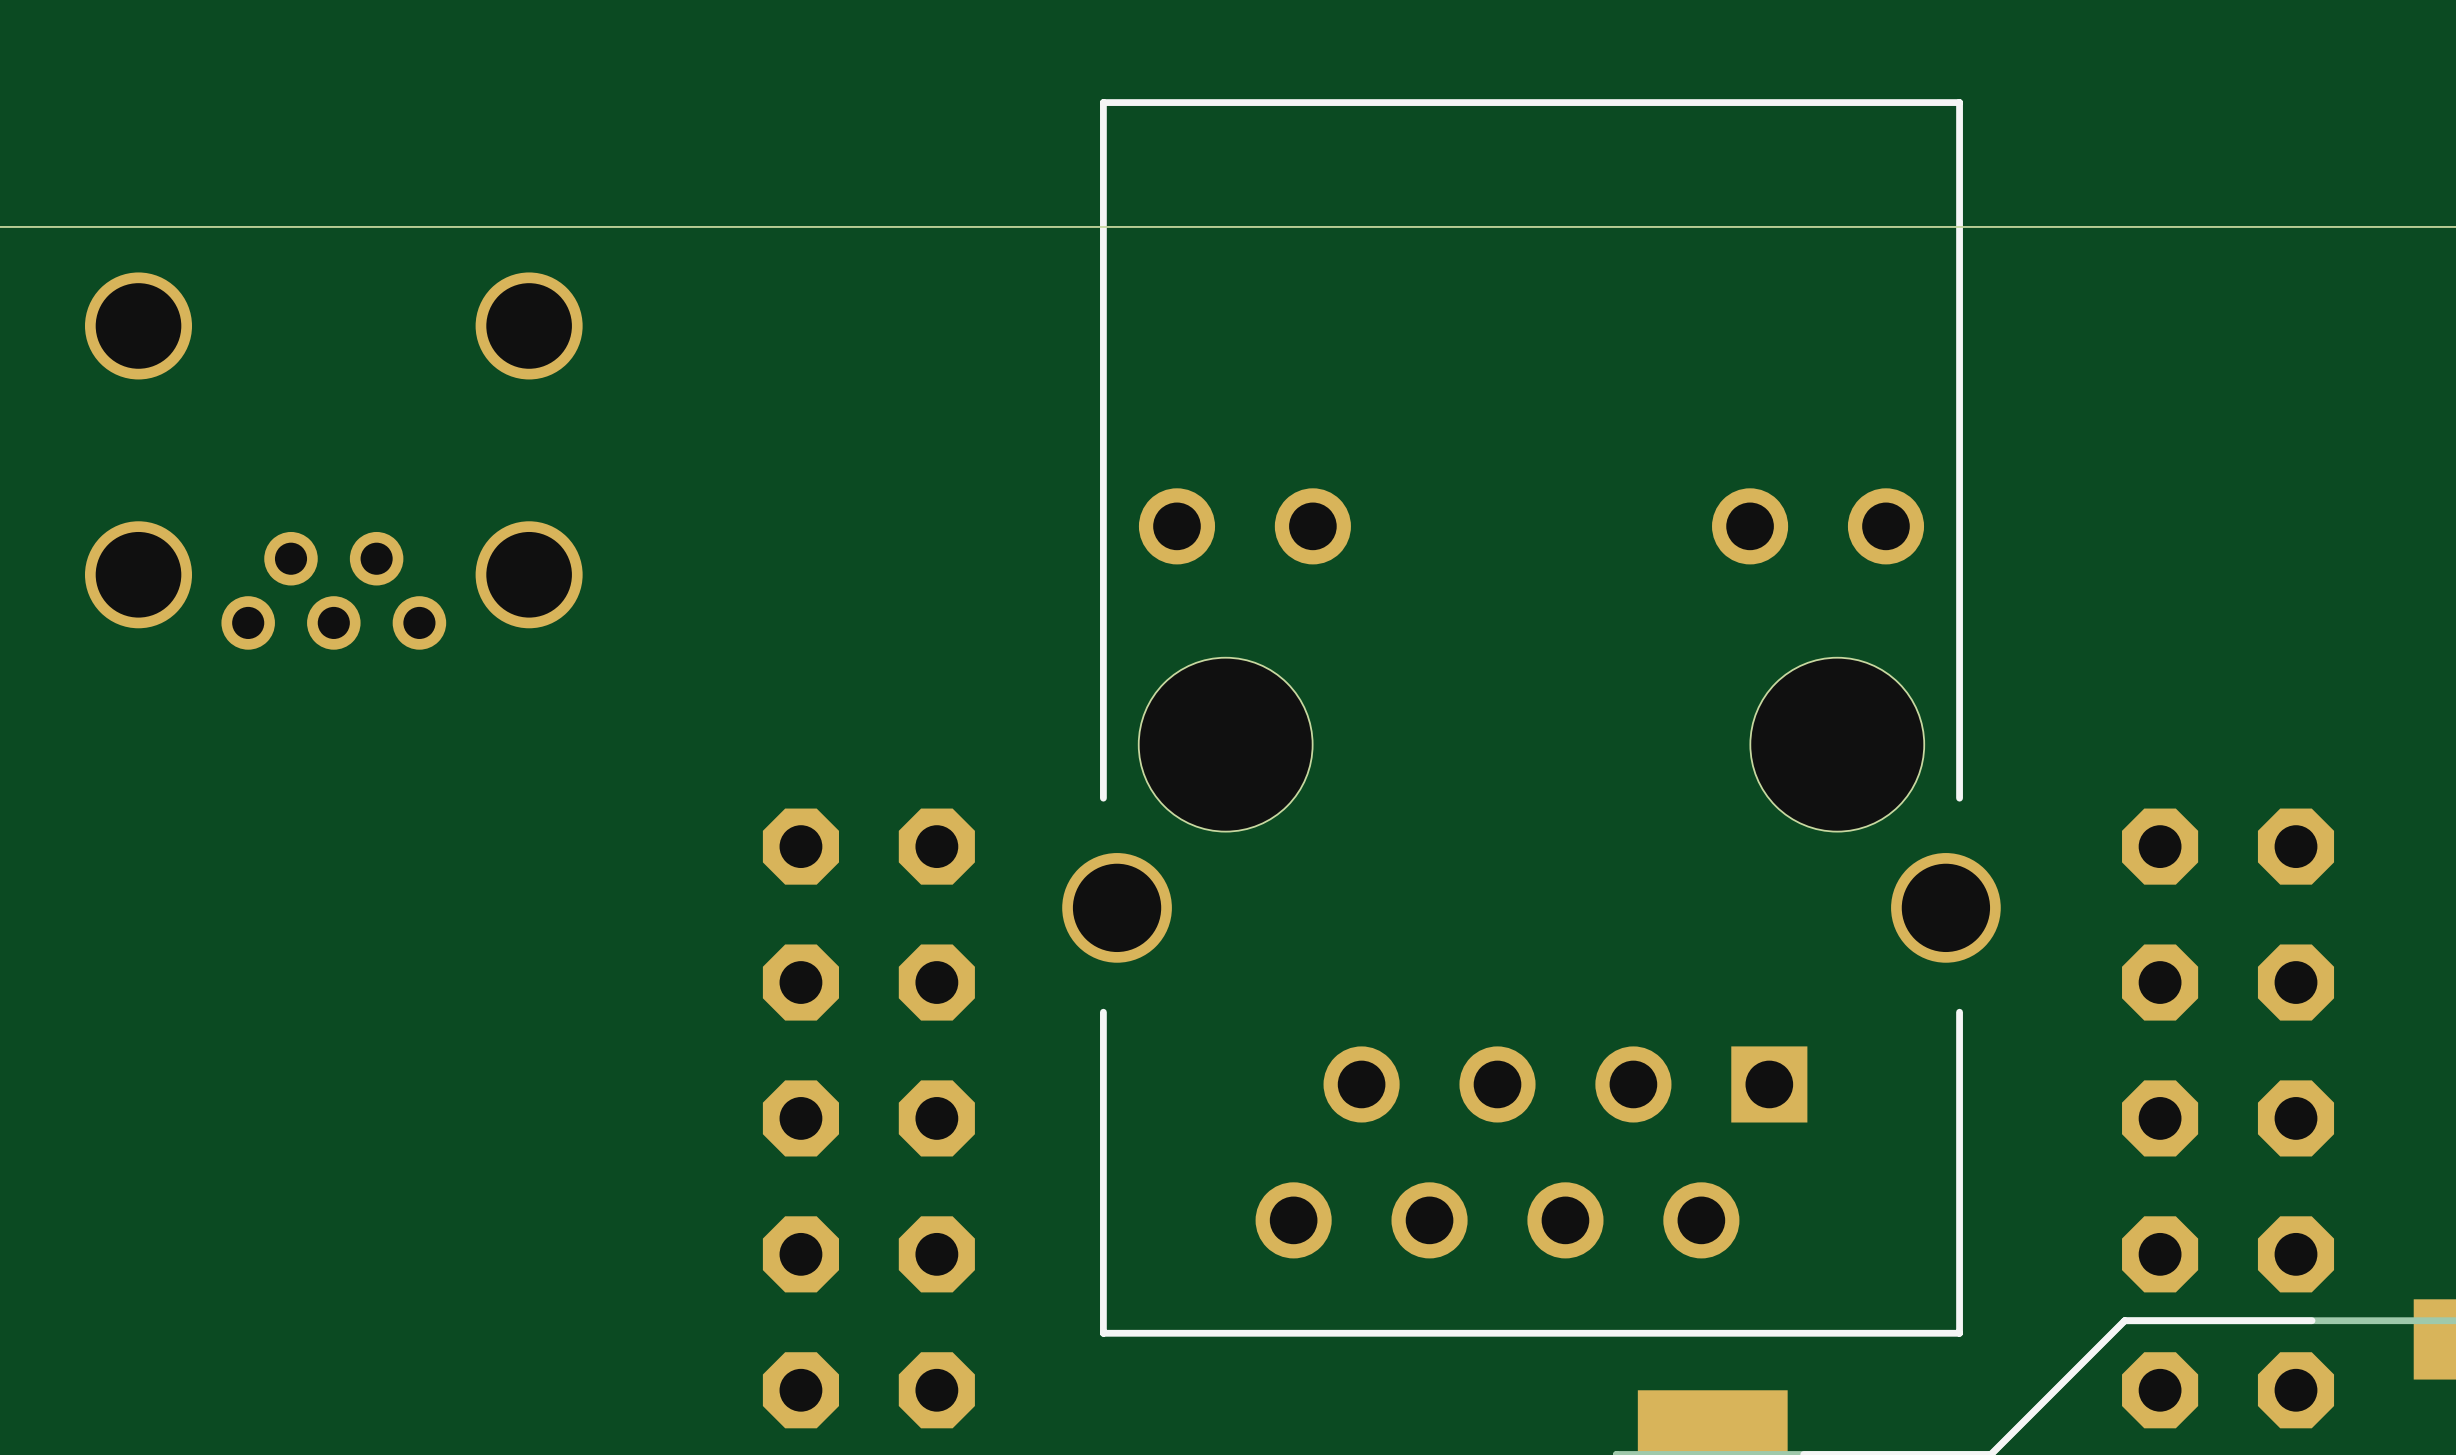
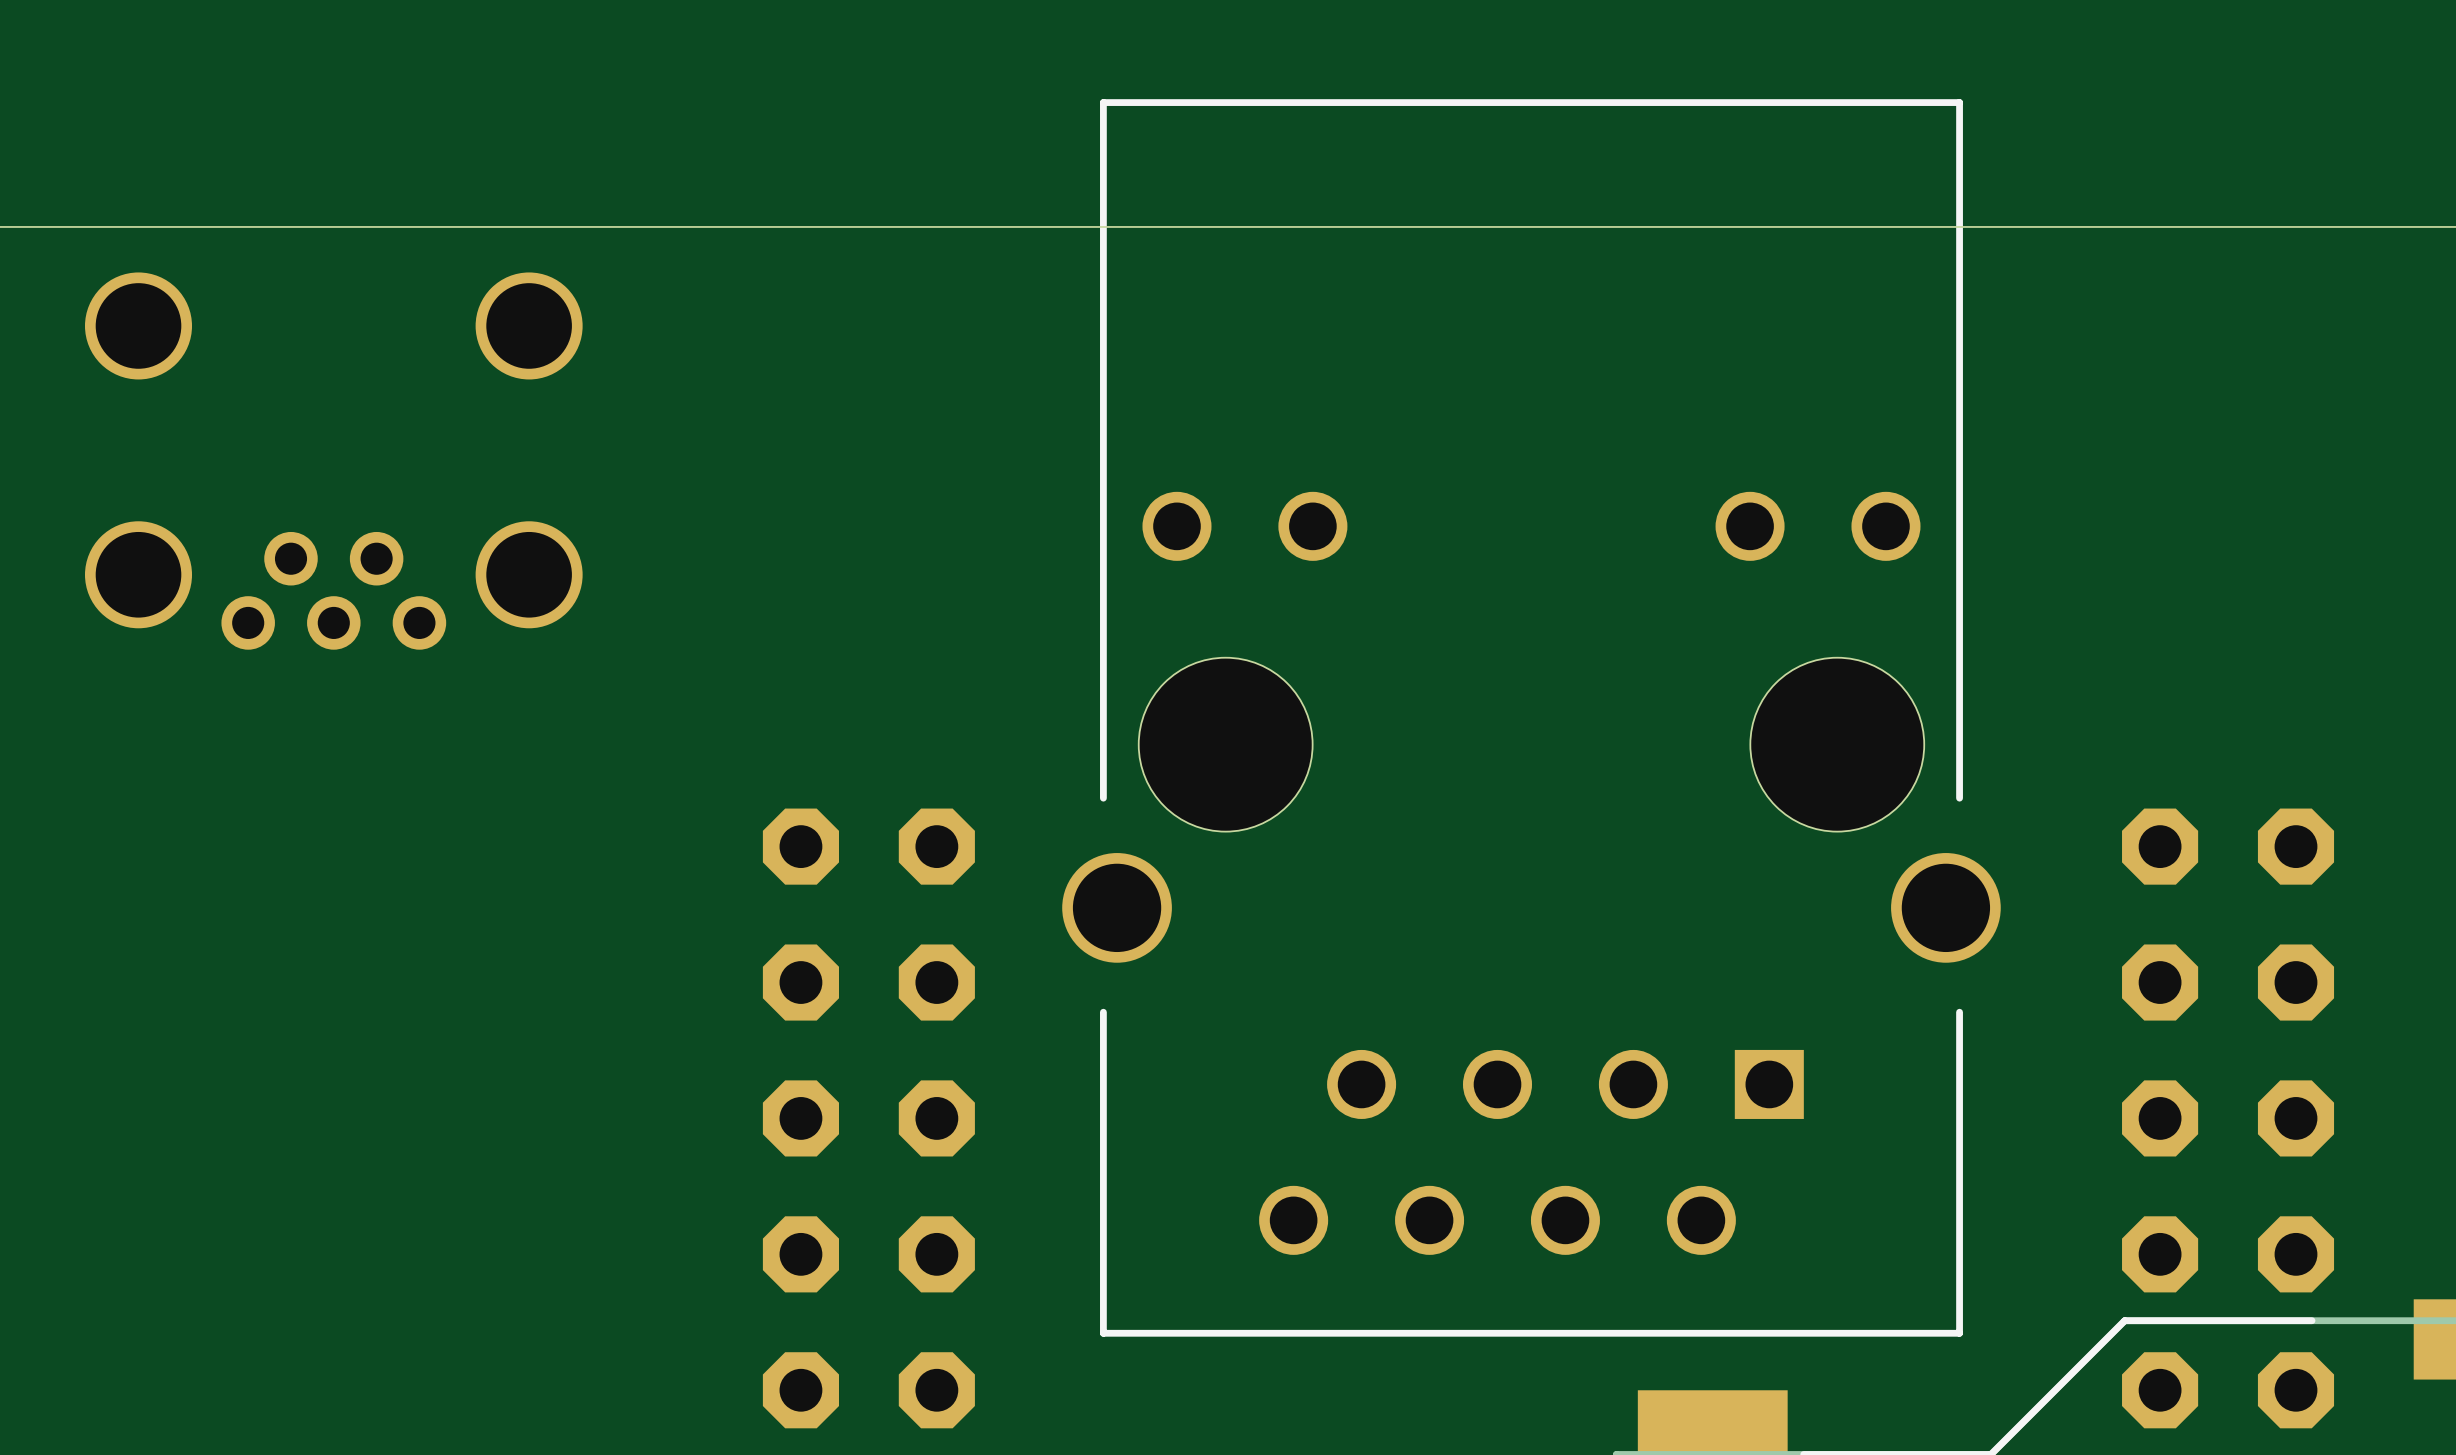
part footprint: [1062, 99, 2001, 1337] -> [1062, 99, 2001, 1337]

